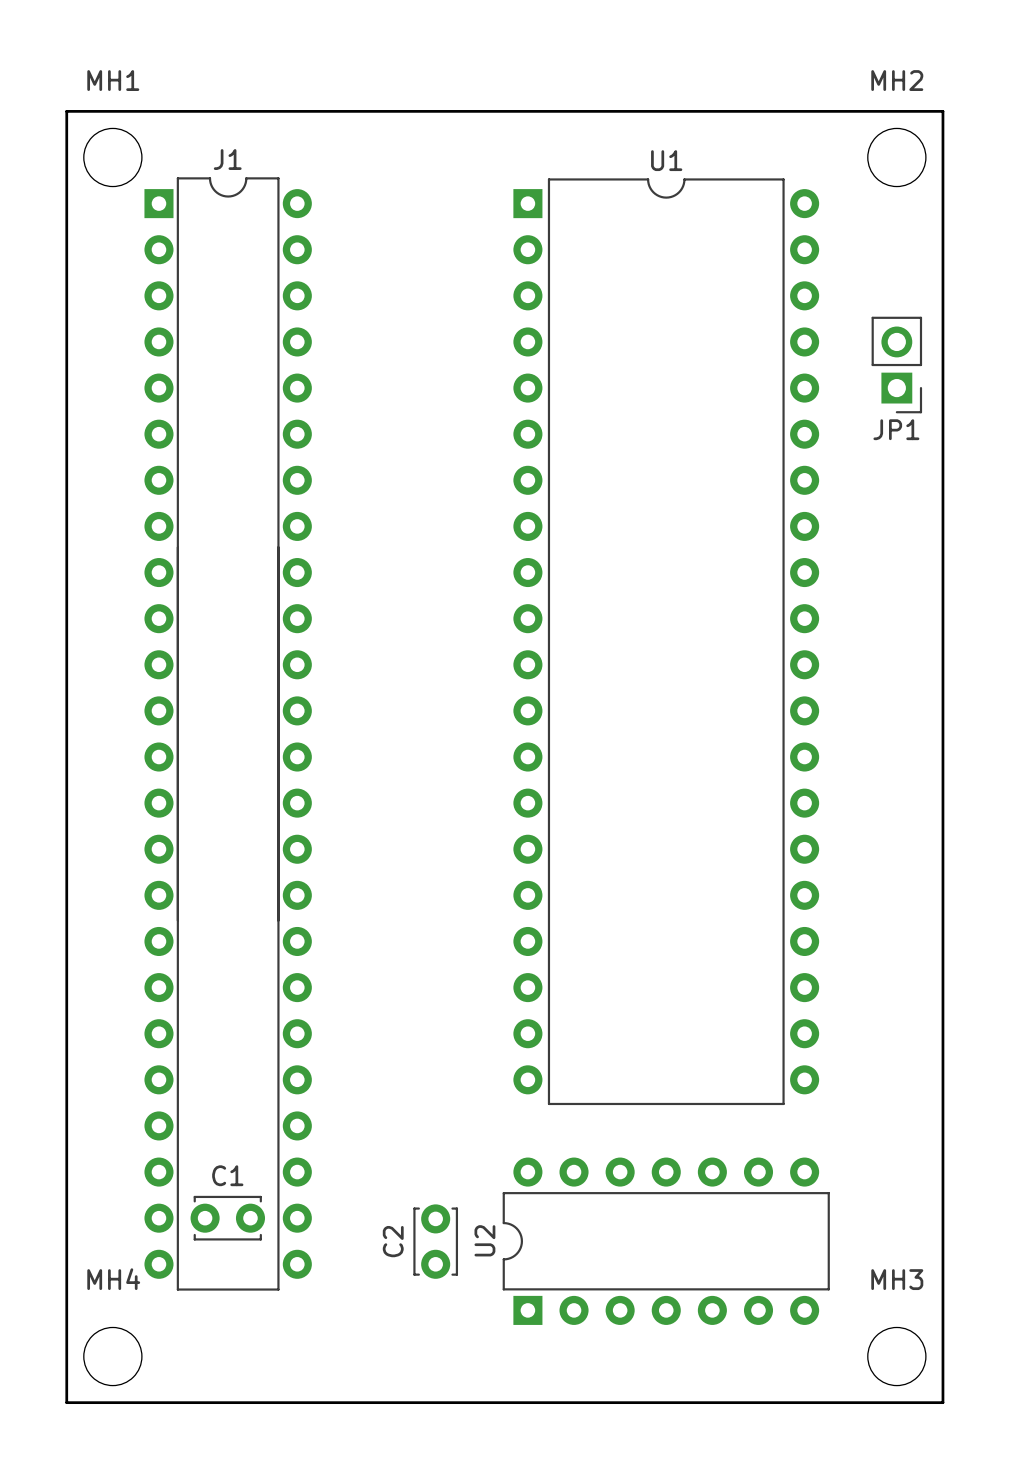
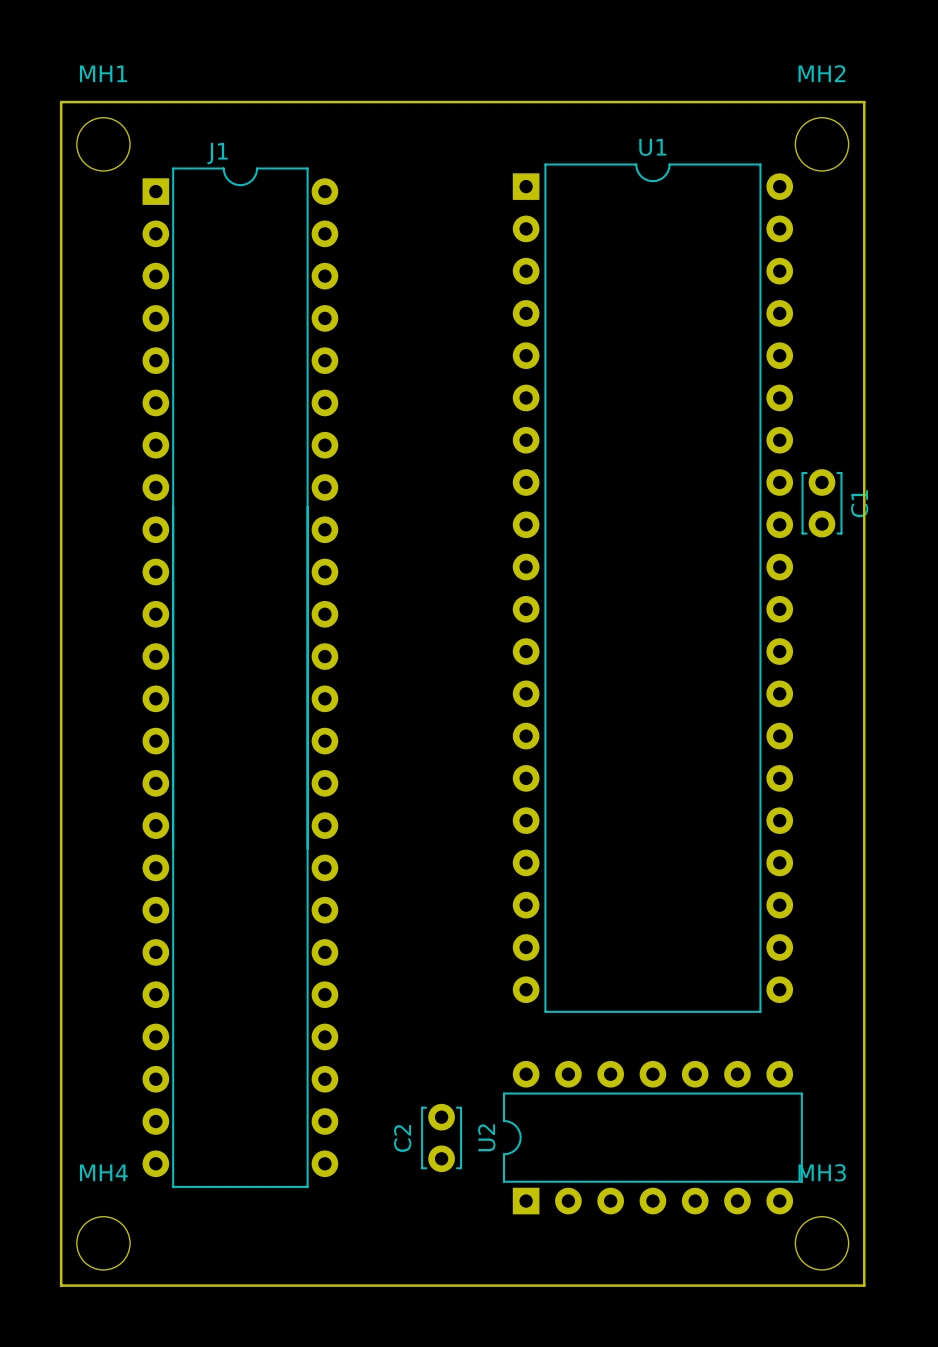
J1 footprint: [144, 177, 312, 1291] -> [142, 167, 339, 1188]
JP1: (896, 365) -> none
U1 position: (666, 641) -> (652, 588)
C1 rotation: 0° (227, 1218) -> 90° clockwise (822, 503)
C1 position: (227, 1218) -> (822, 503)
C2 position: (435, 1241) -> (441, 1137)
U2 position: (666, 1241) -> (652, 1137)

